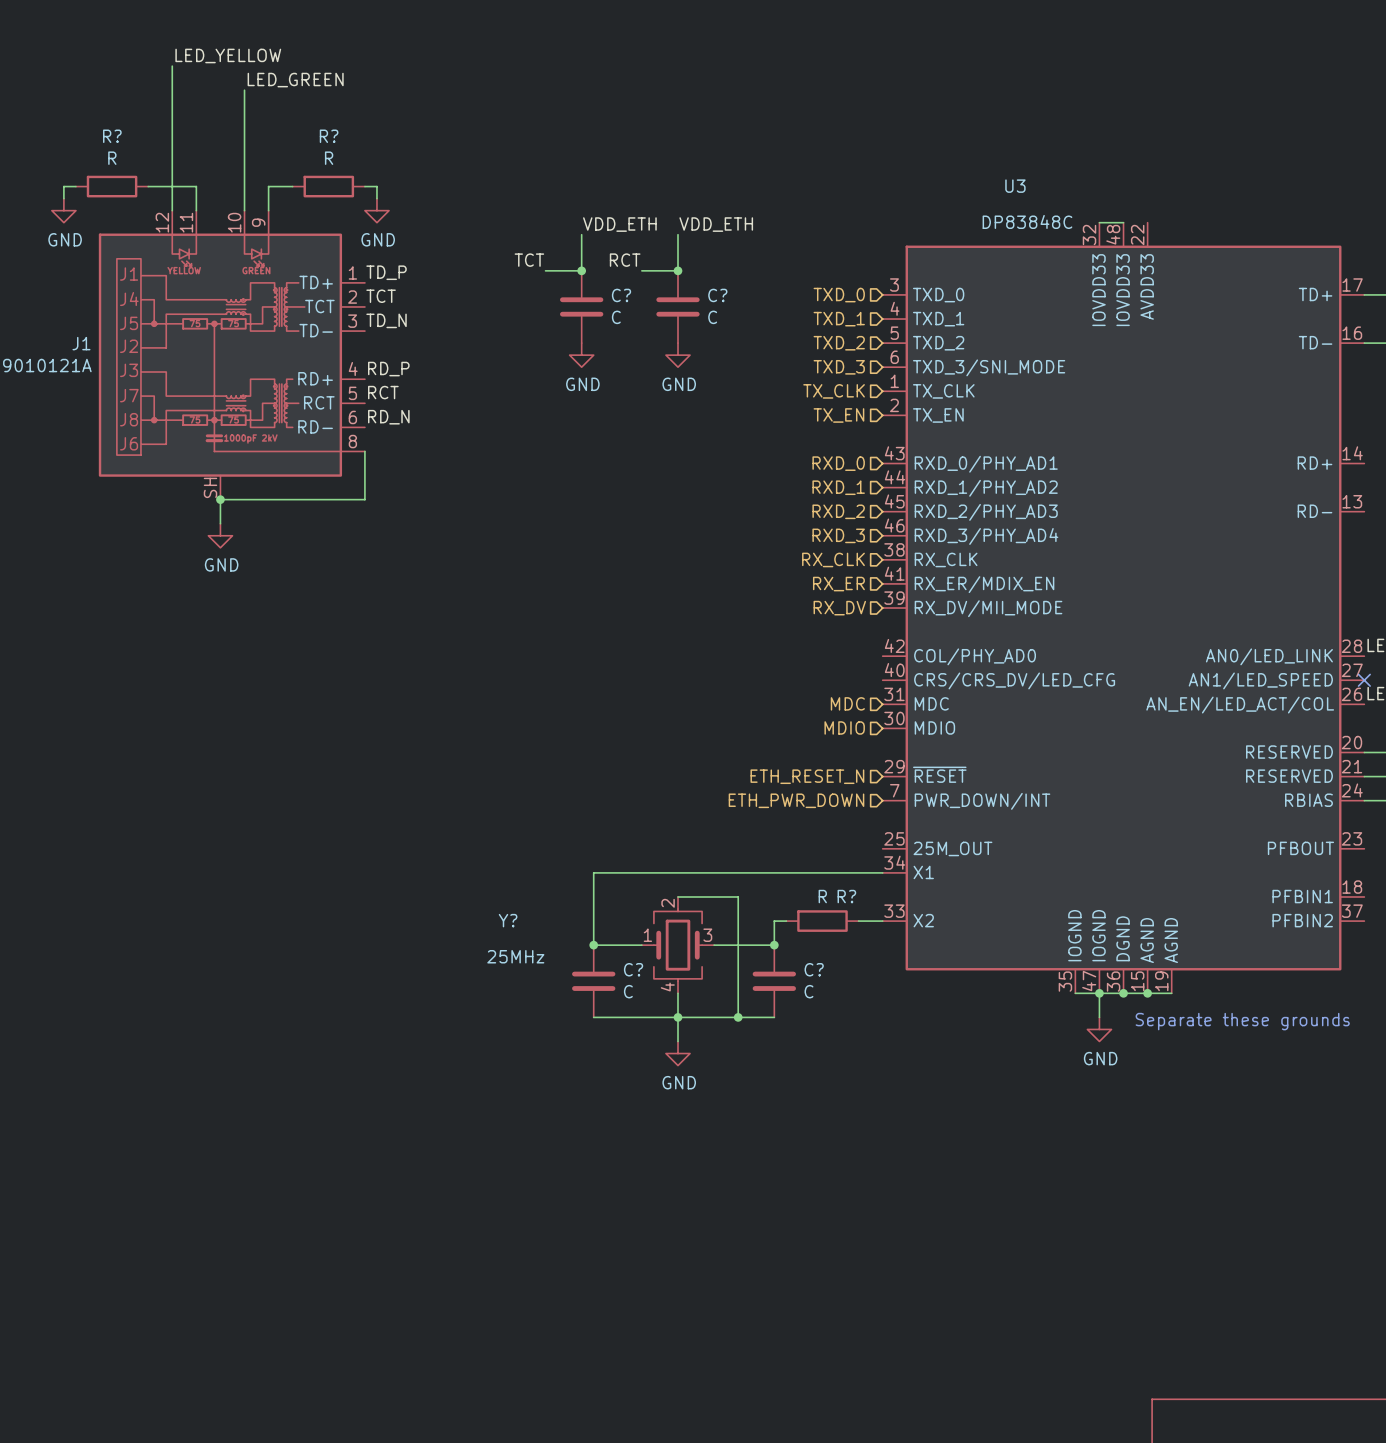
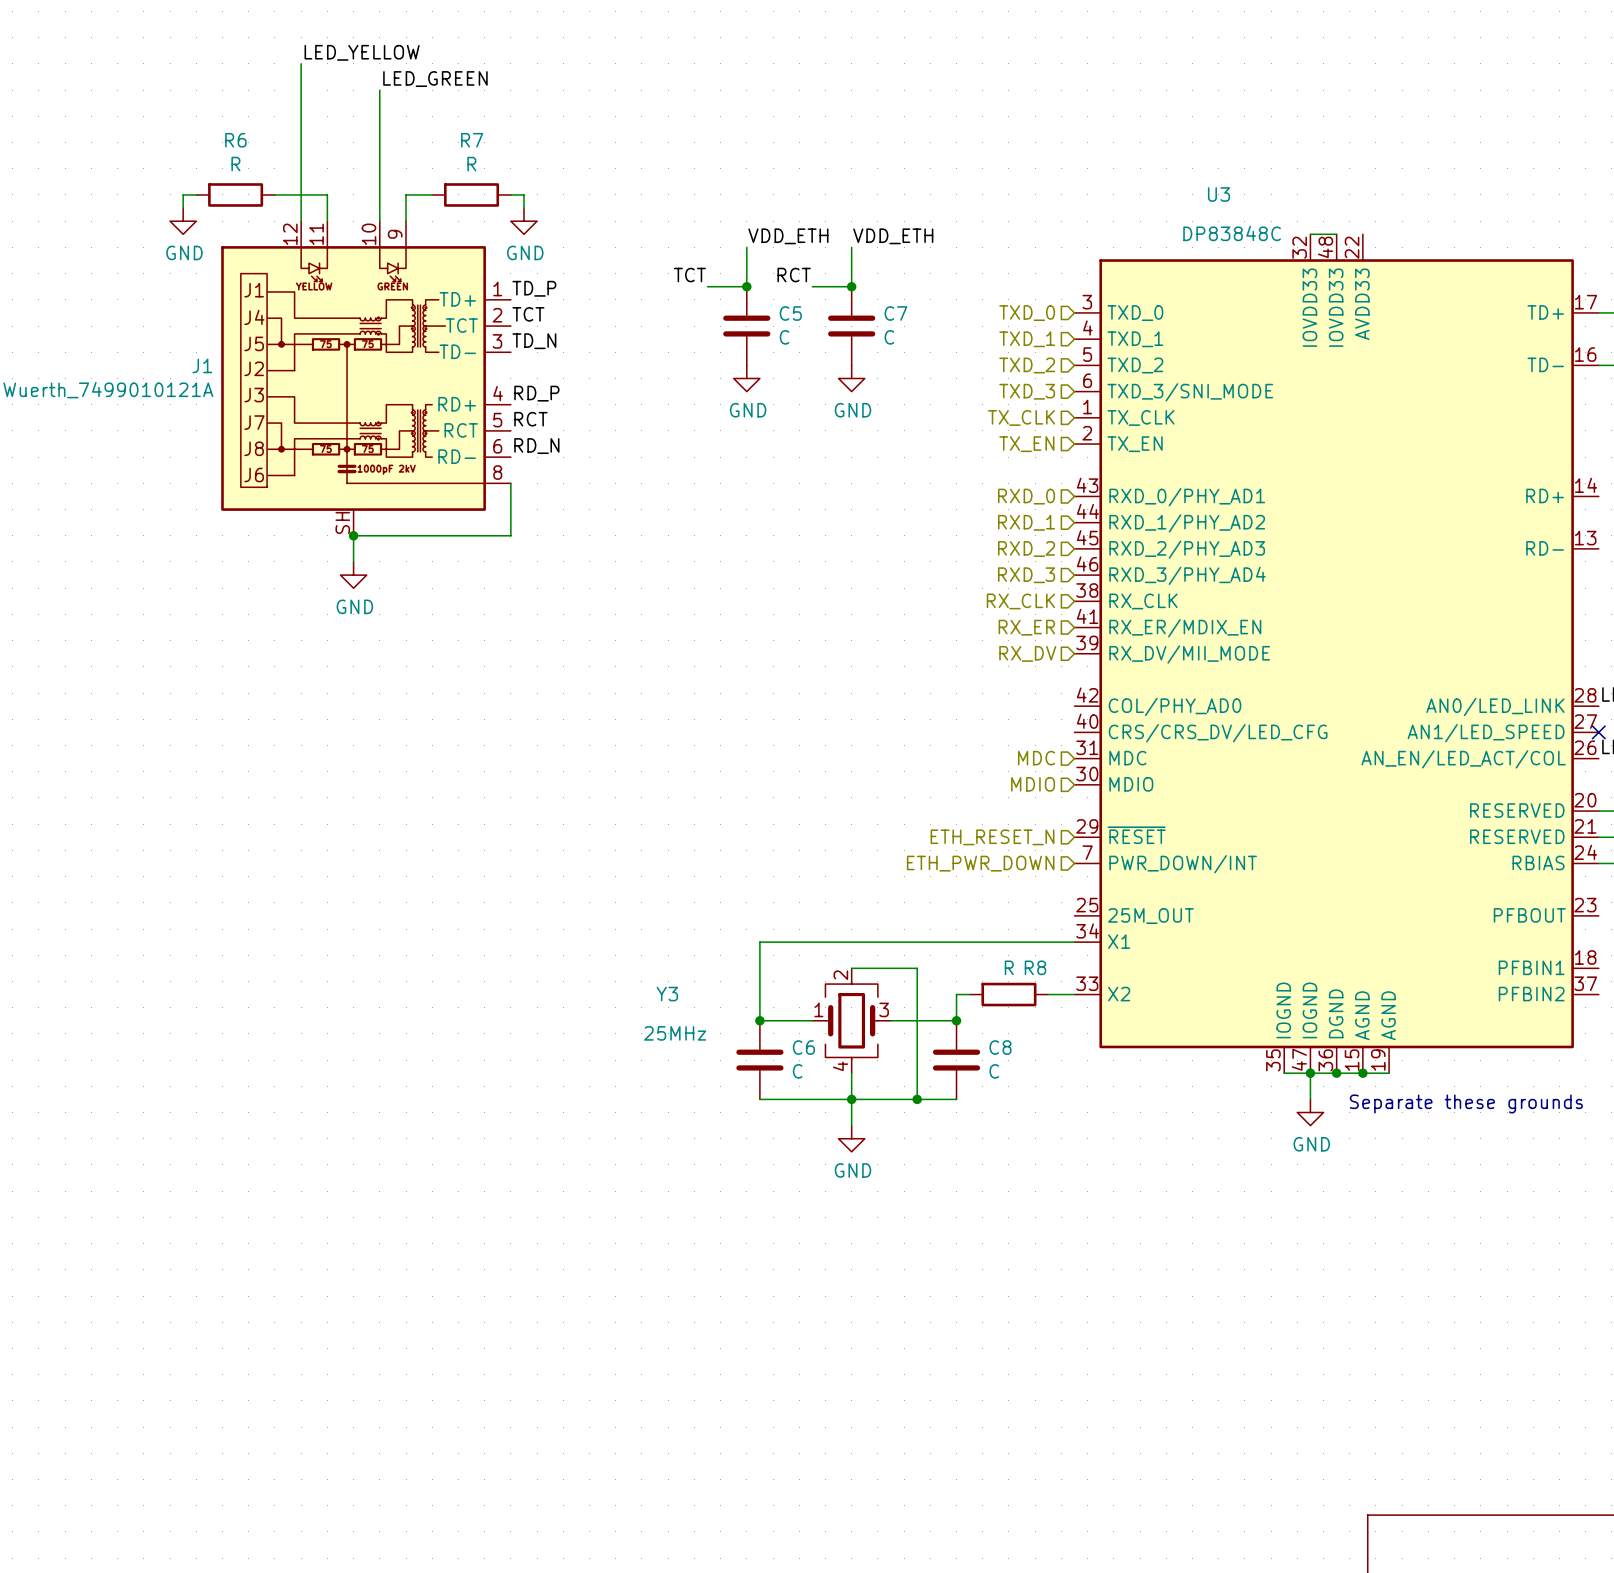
R? name: R? (112, 136) -> R6 (235, 140)
R? name: R? (329, 136) -> R7 (472, 140)
C? name: C? (621, 295) -> C5 (790, 313)
C? name: C? (717, 295) -> C7 (895, 313)
R? name: R? (846, 896) -> R8 (1035, 967)
Y? name: Y? (508, 920) -> Y3 (667, 994)
C? name: C? (633, 969) -> C6 (803, 1047)
C? name: C? (814, 969) -> C8 (1000, 1047)

